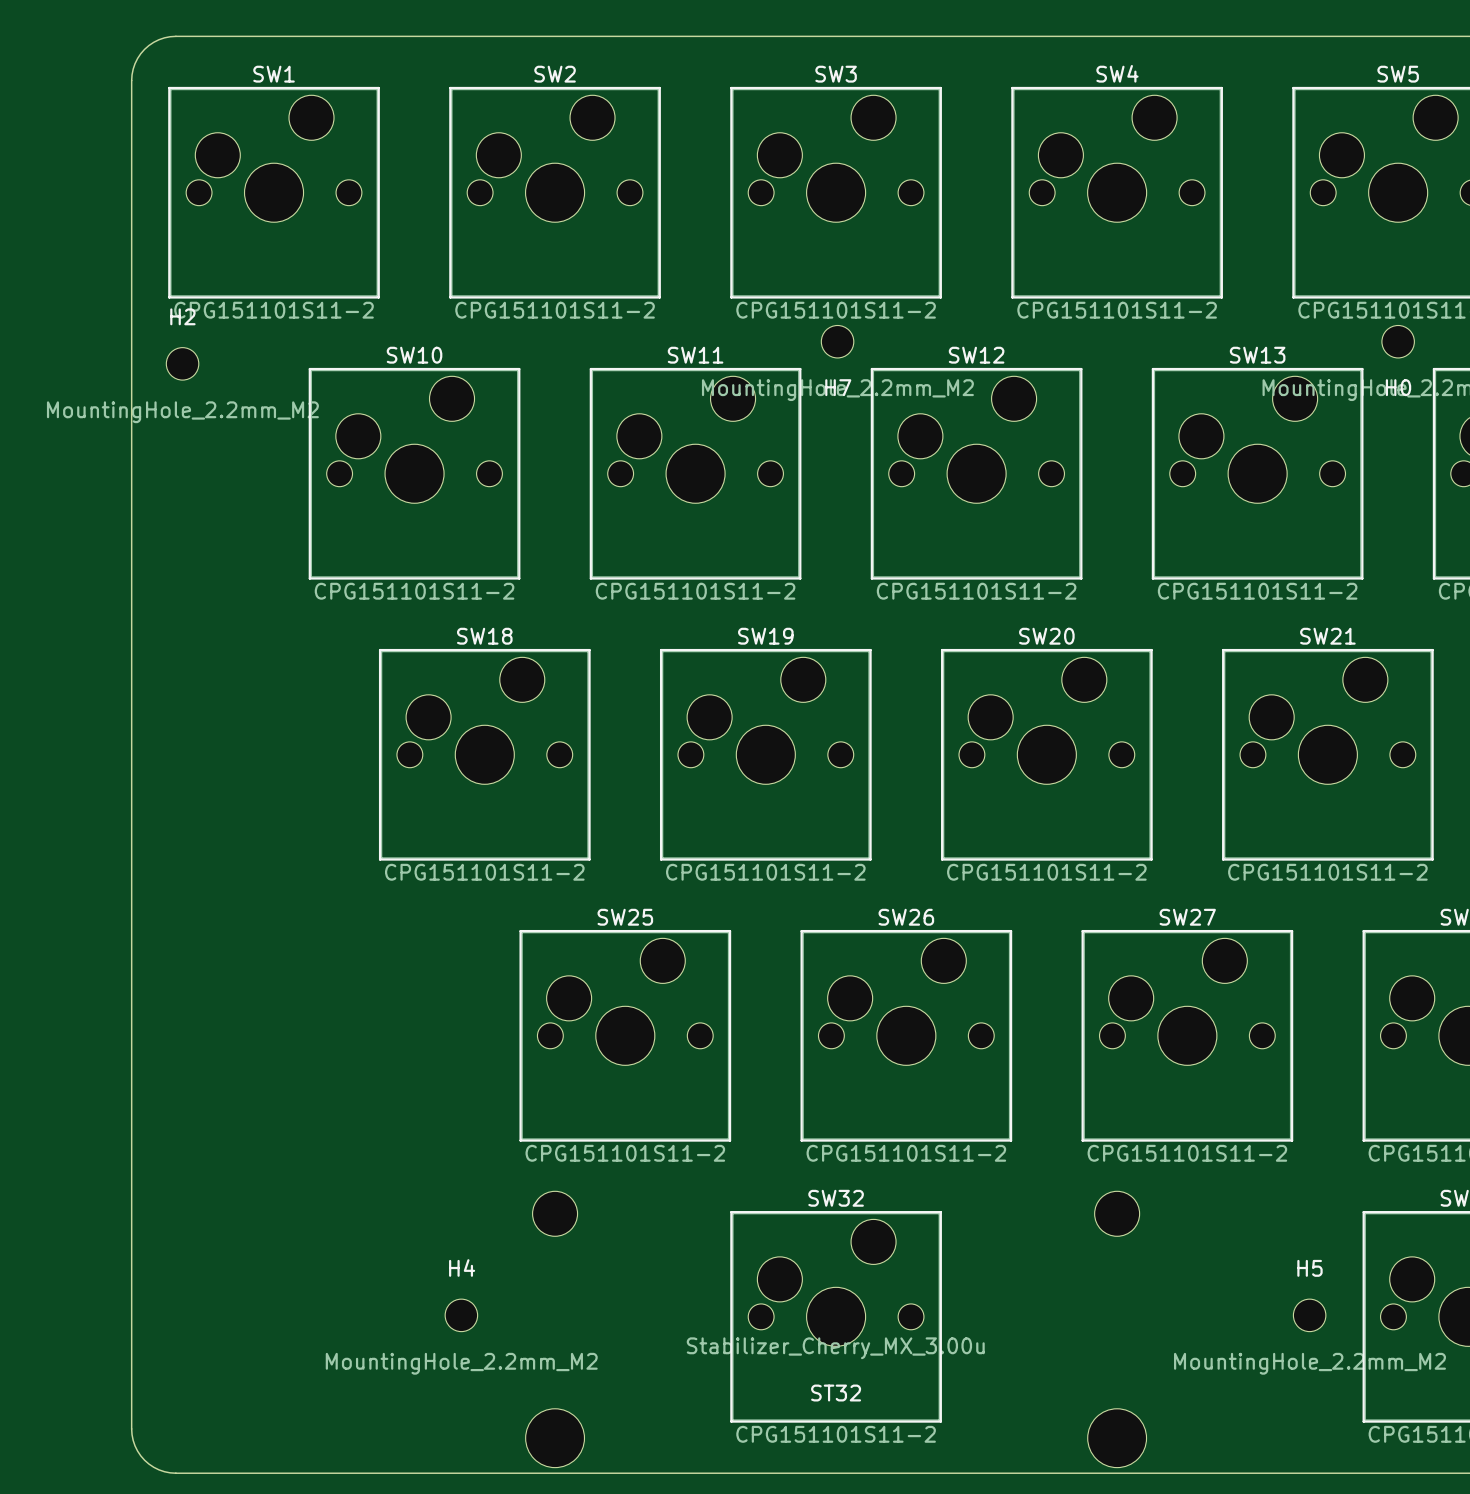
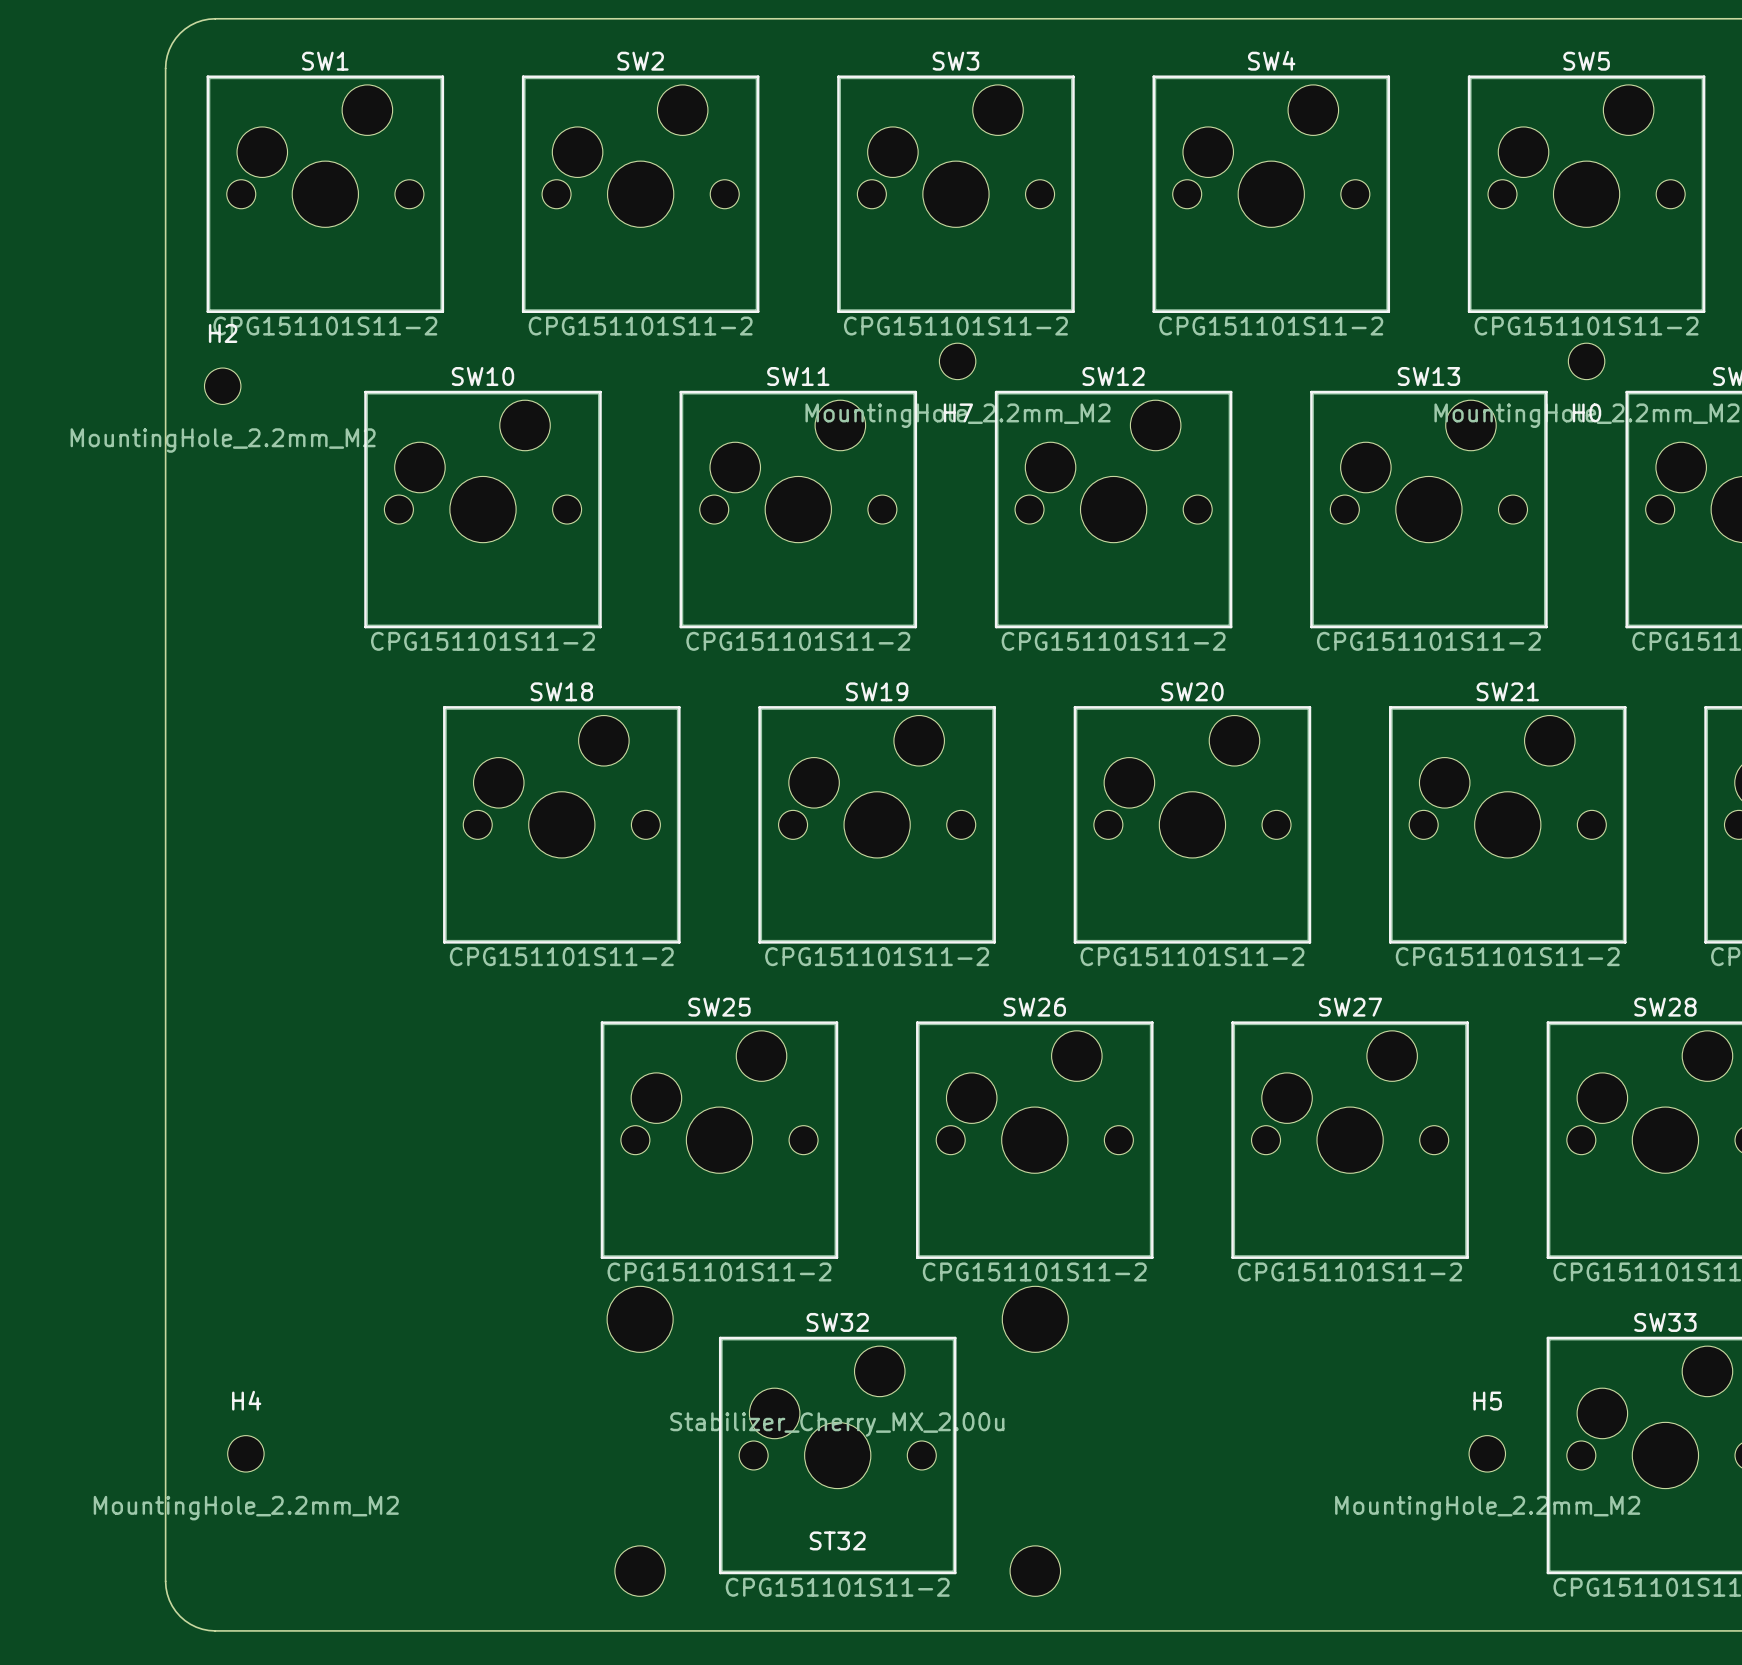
ST32 footprint: [525, 1191, 1147, 1468] -> [607, 1286, 1069, 1597]
H4 position: (461, 1315) -> (245, 1453)
SW32 position: (836, 1316) -> (837, 1455)
ST32 value: Stabilizer_Cherry_MX_3.00u (835, 1348) -> Stabilizer_Cherry_MX_2.00u (837, 1424)

